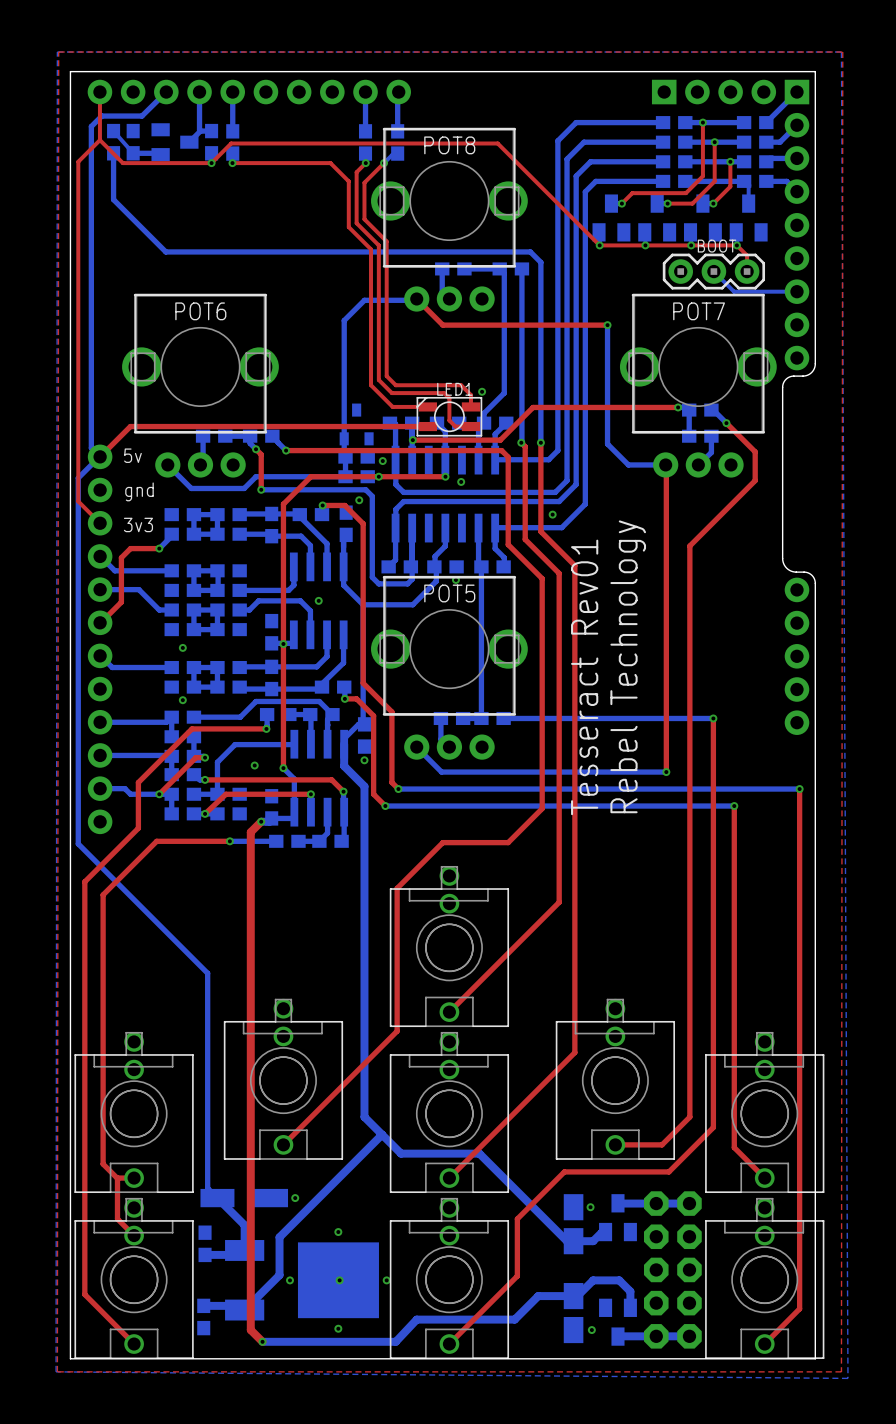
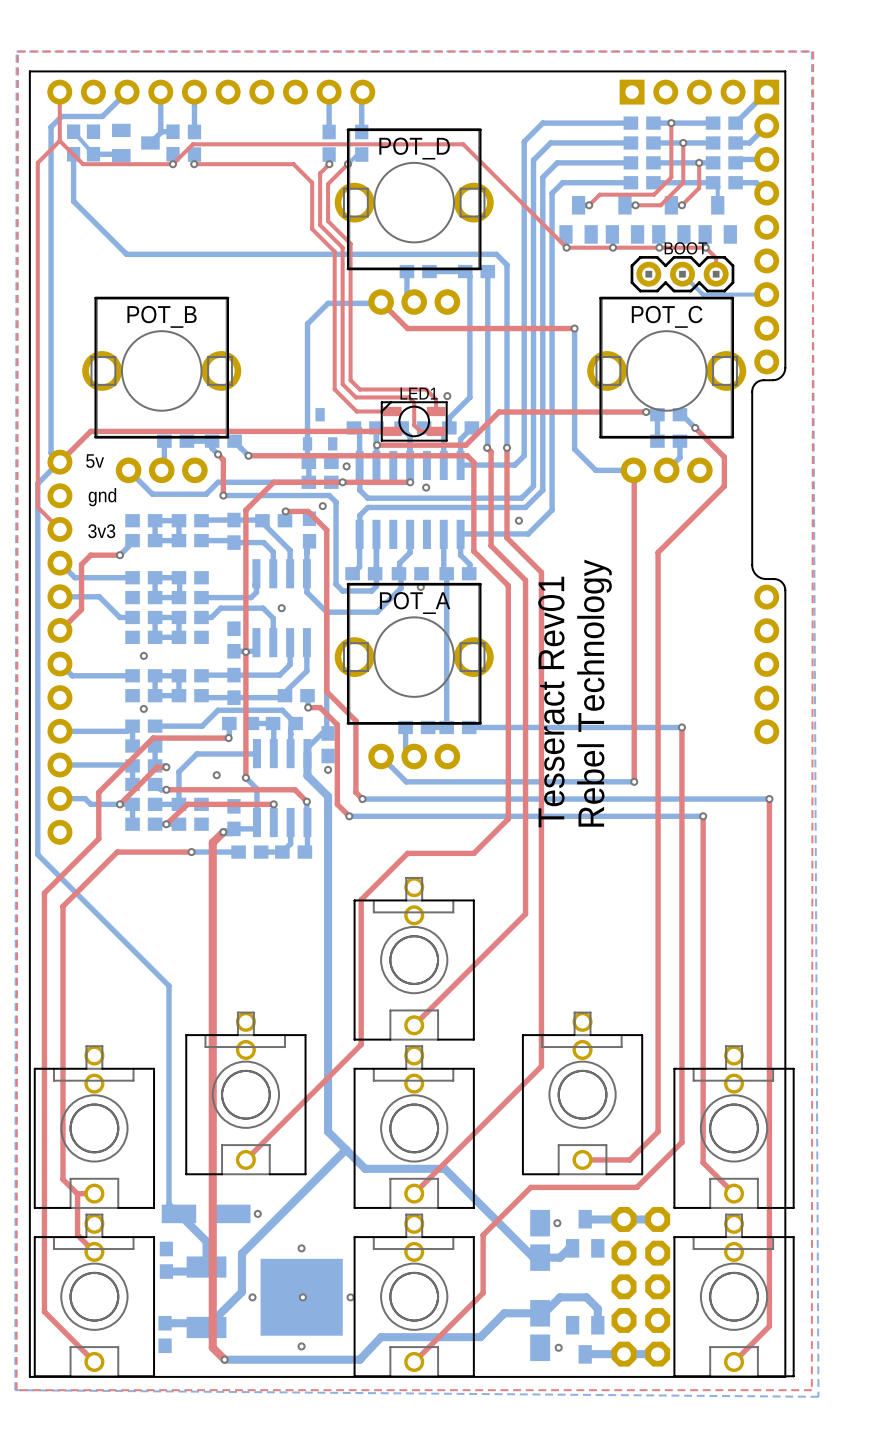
POT8 name: POT8 (449, 145) -> POT_D (414, 148)
POT6 name: POT6 (200, 311) -> POT_B (162, 316)
POT7 name: POT7 (699, 311) -> POT_C (667, 316)
POT5 name: POT5 (449, 593) -> POT_A (415, 603)

